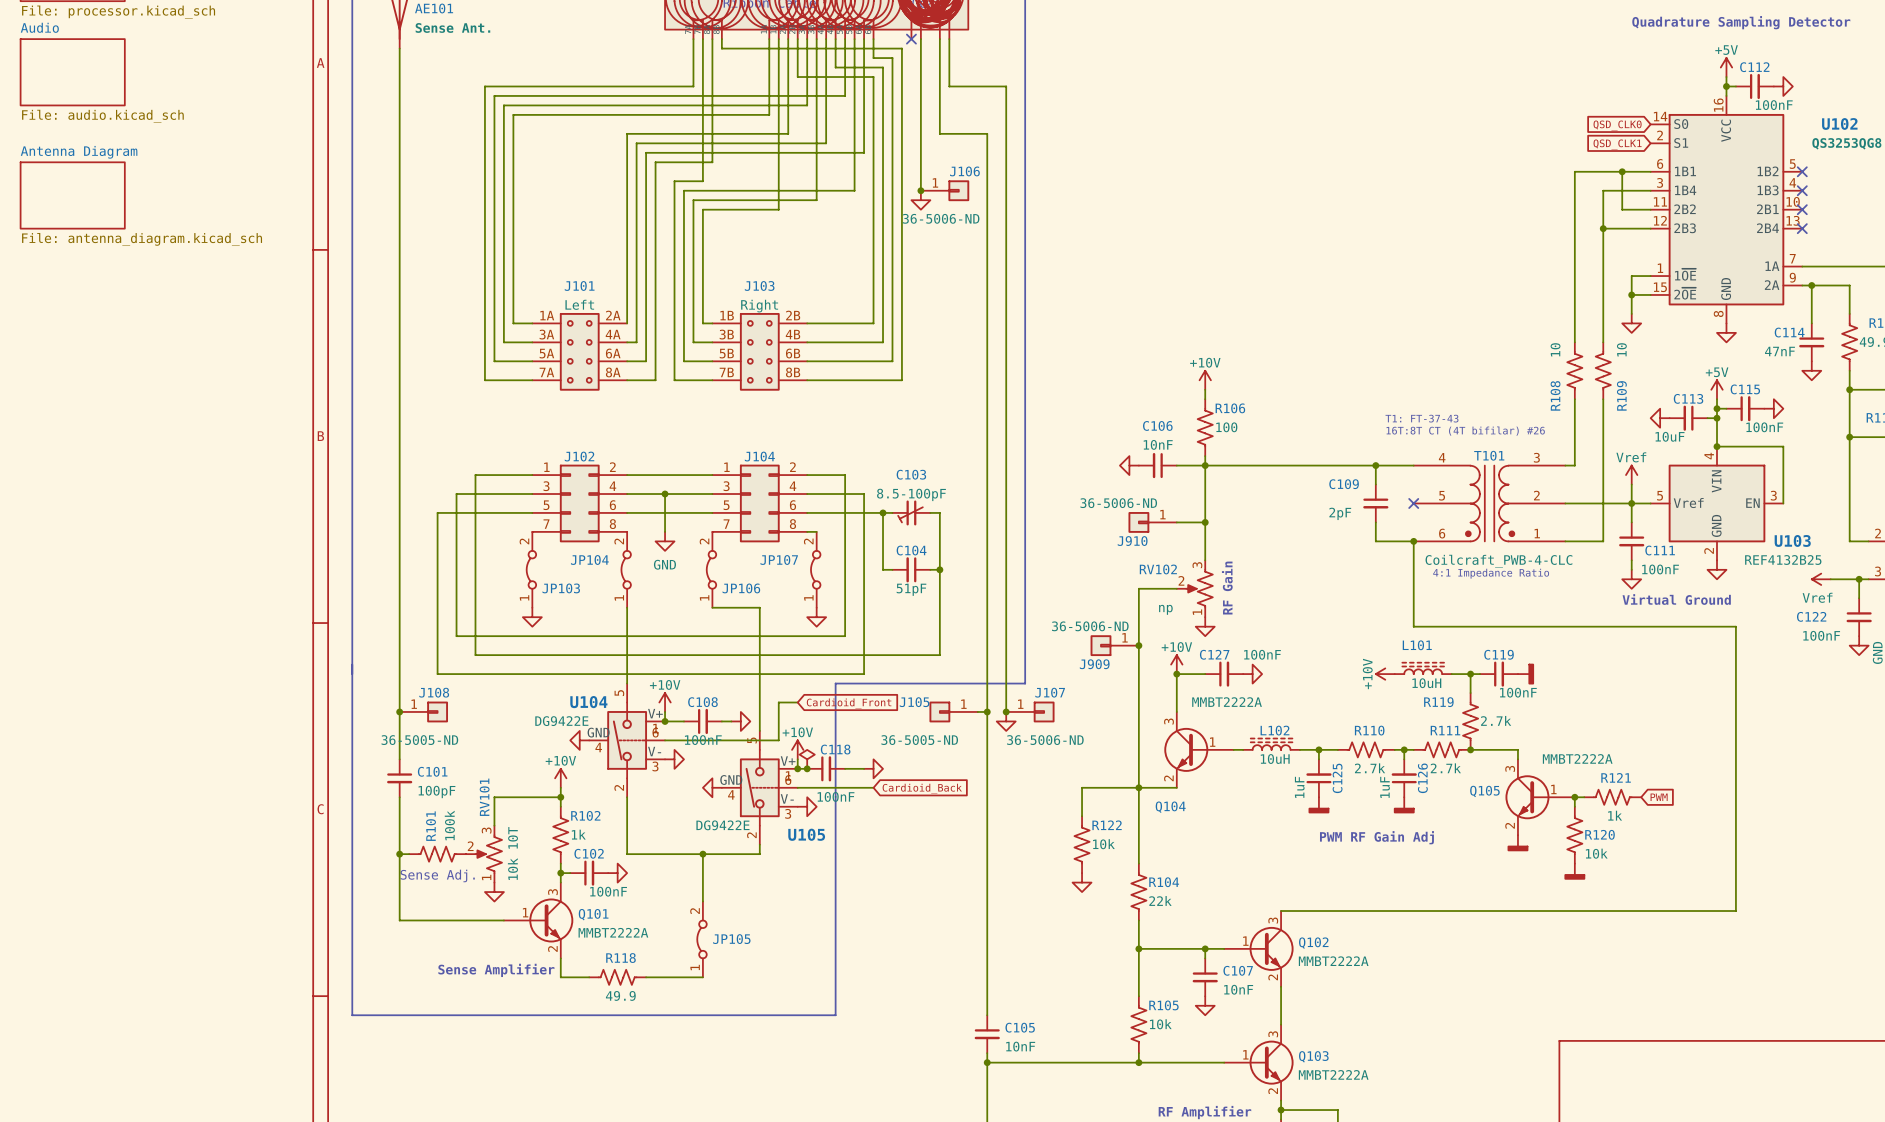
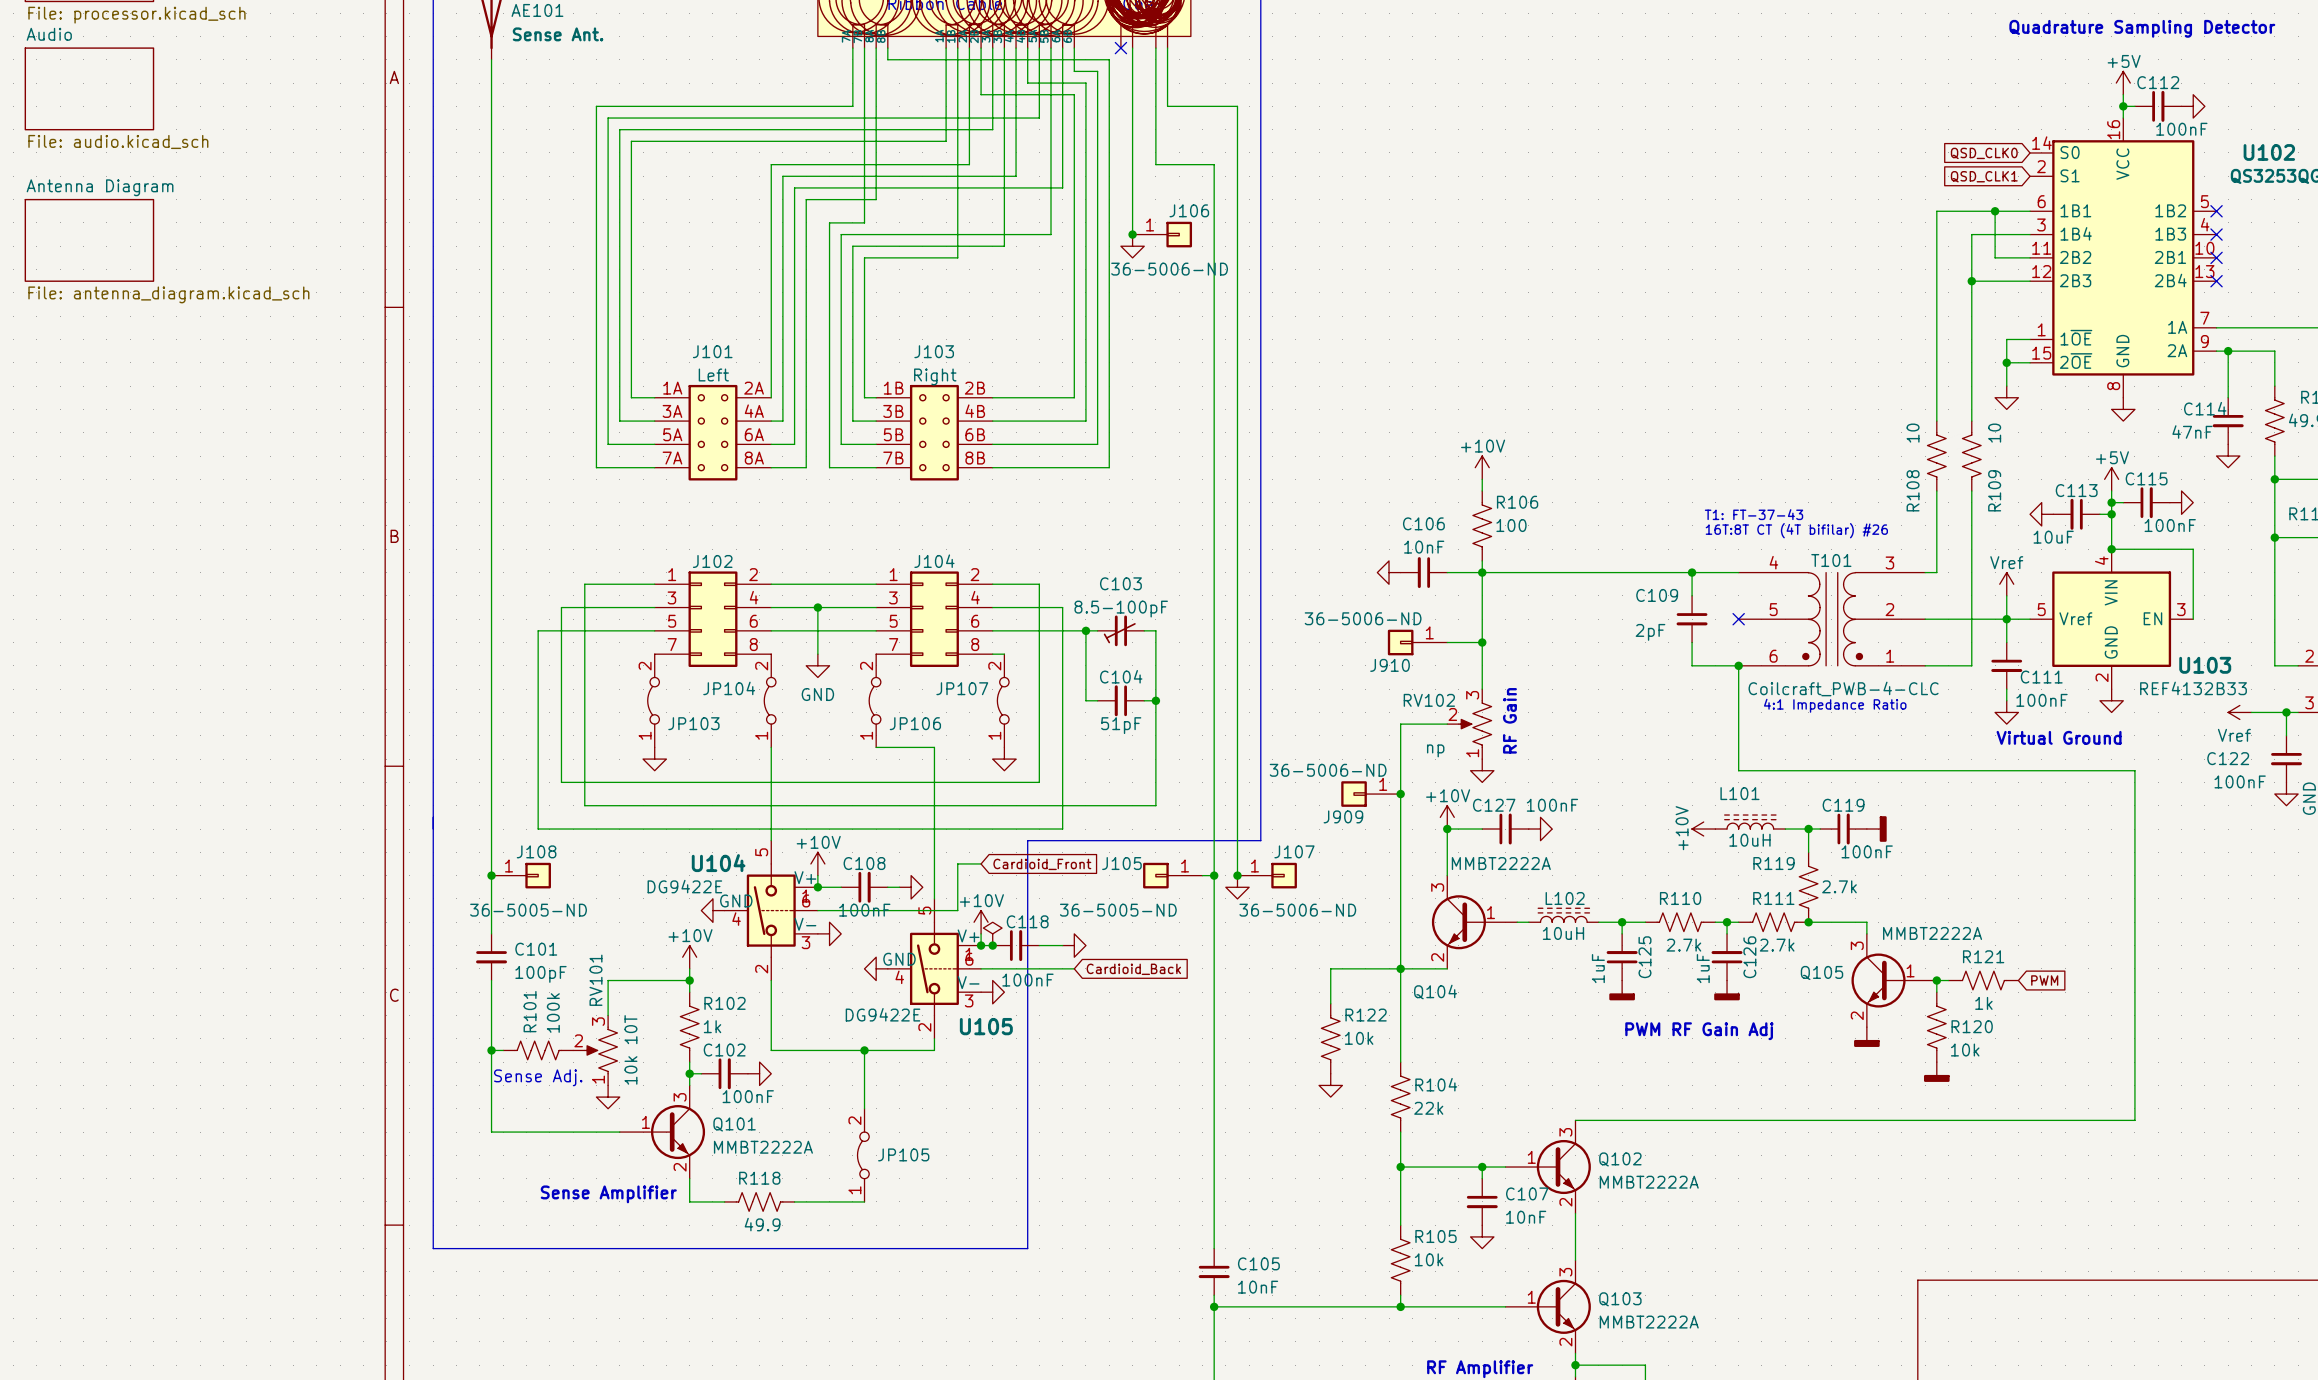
U103 value: REF4132B25 (1783, 560) -> REF4132B33 (2193, 688)

